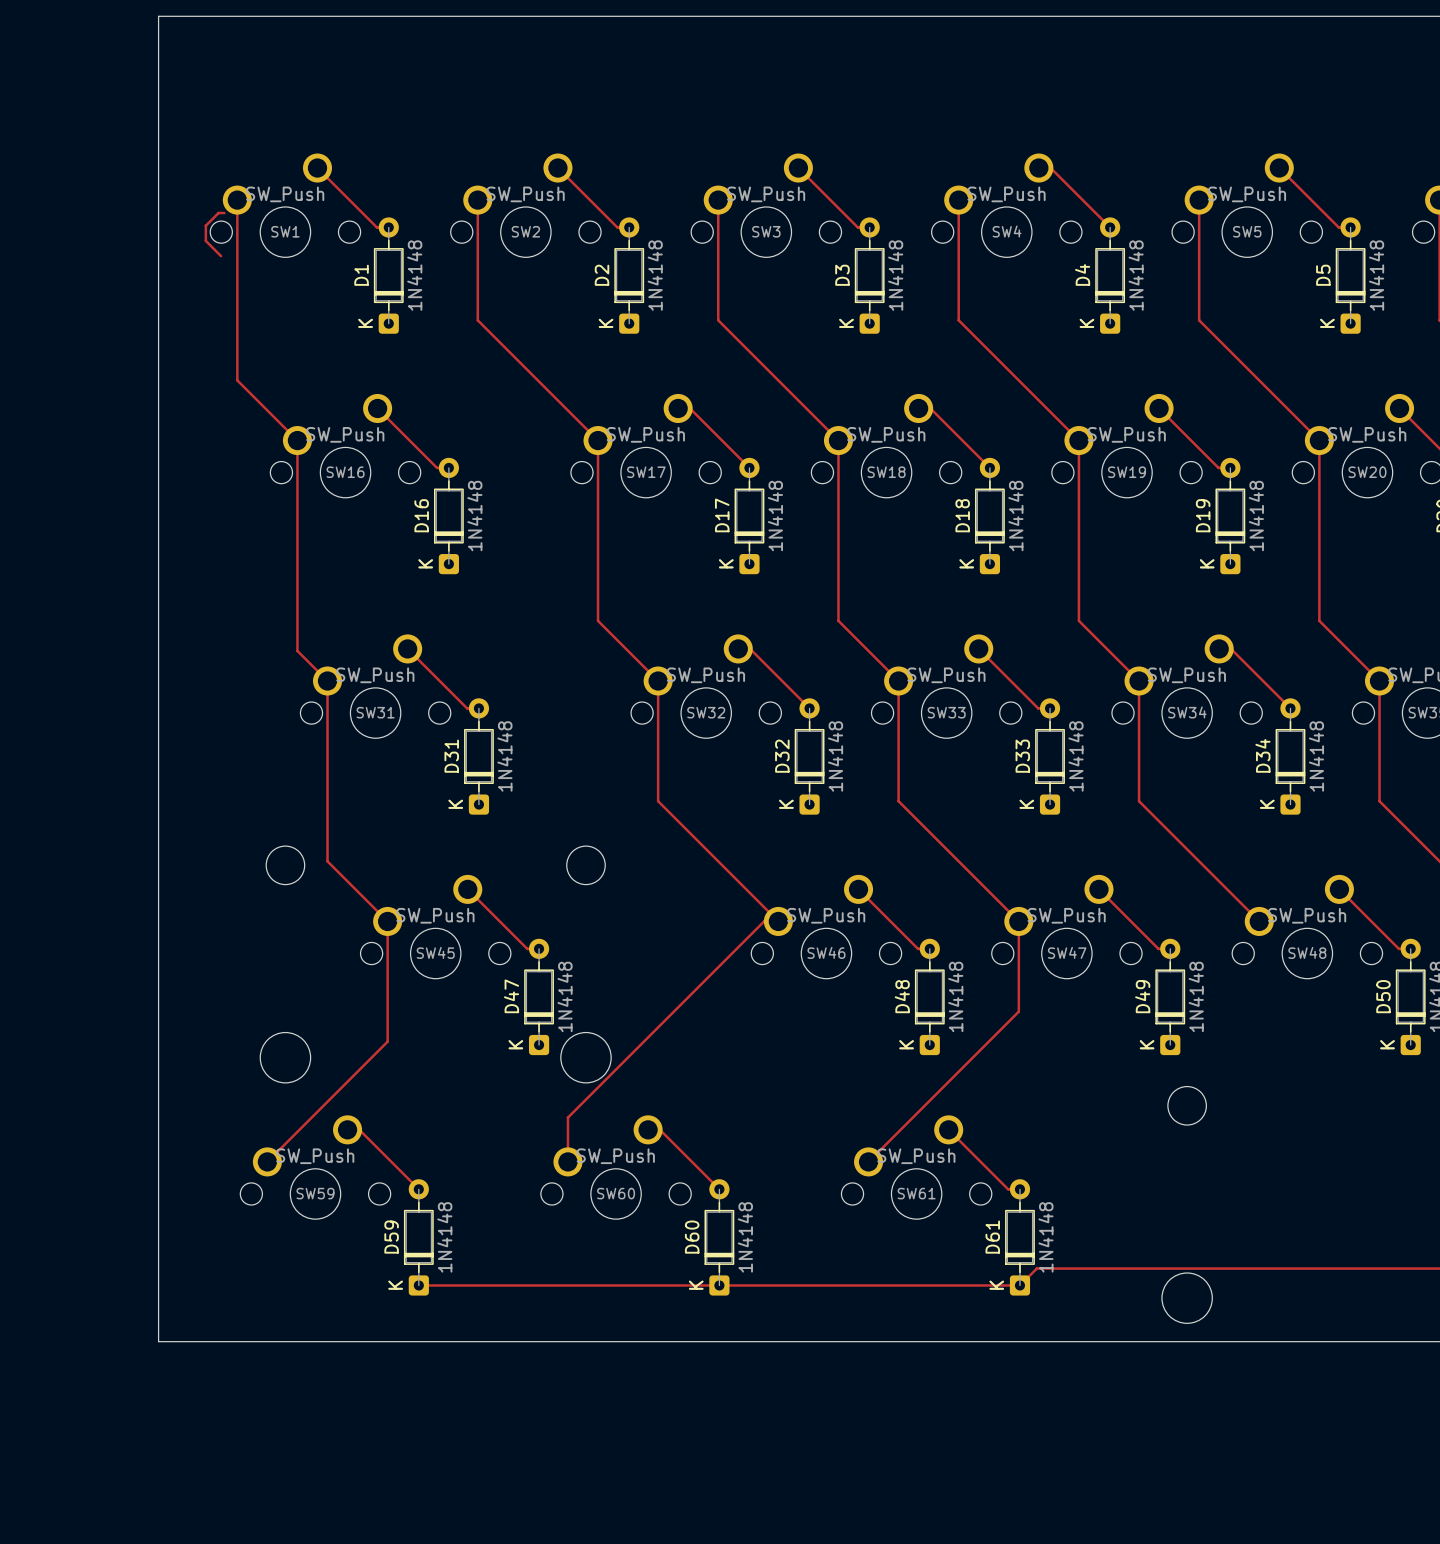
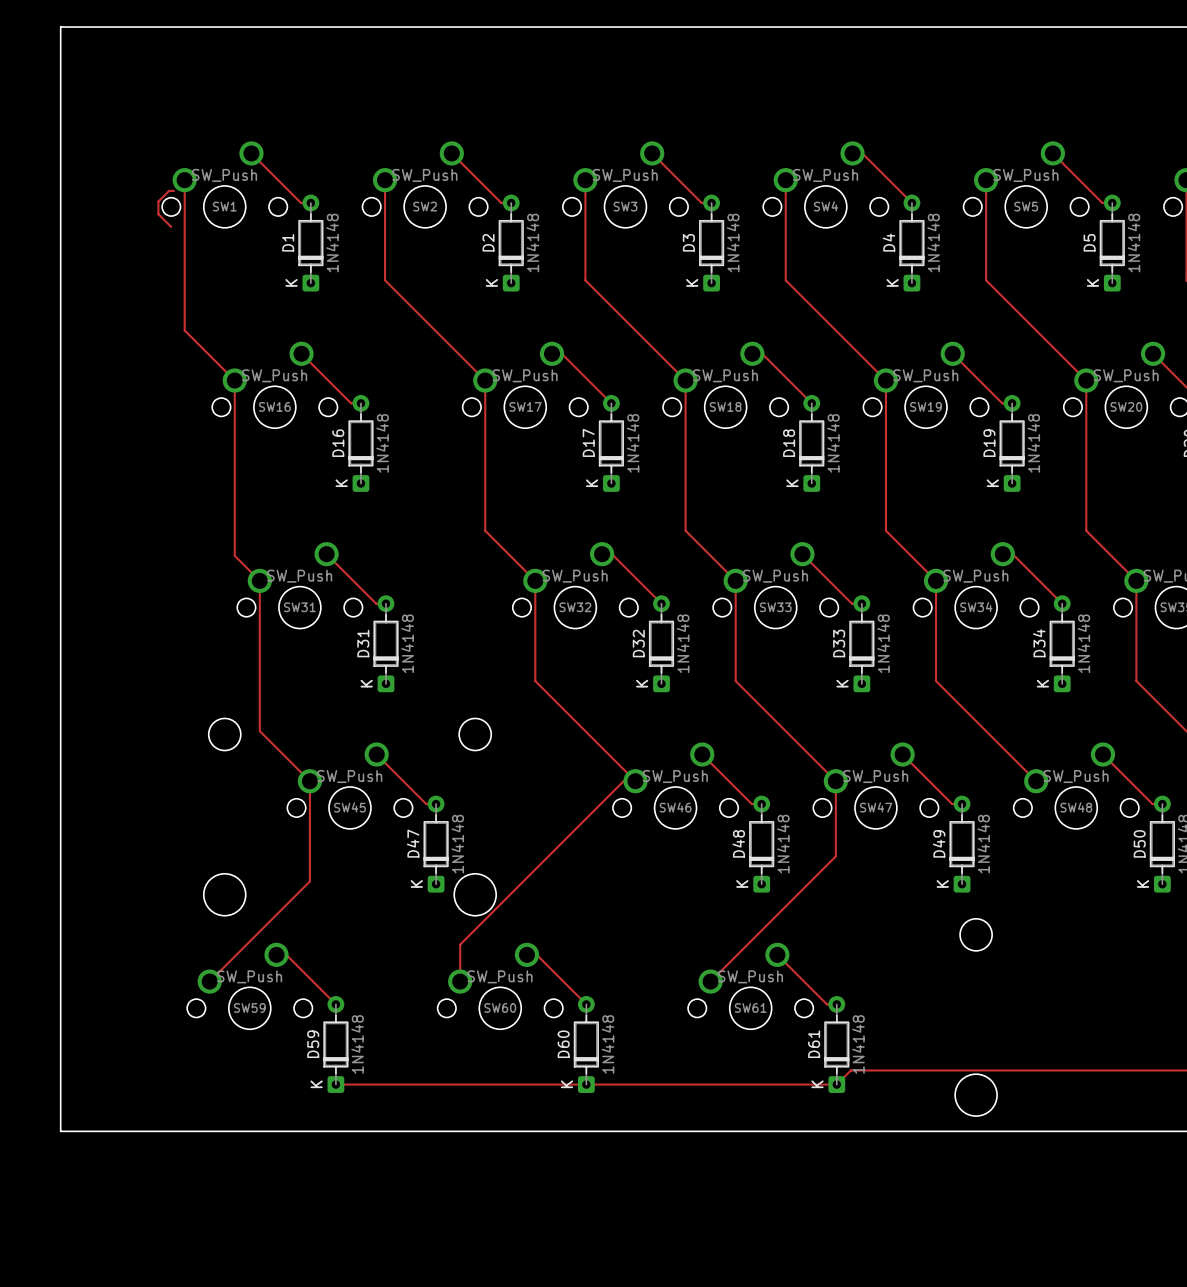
board edge: (158, 16) (158, 1341) -> (119, 27) (60, 27) (60, 1131) (119, 1131)

